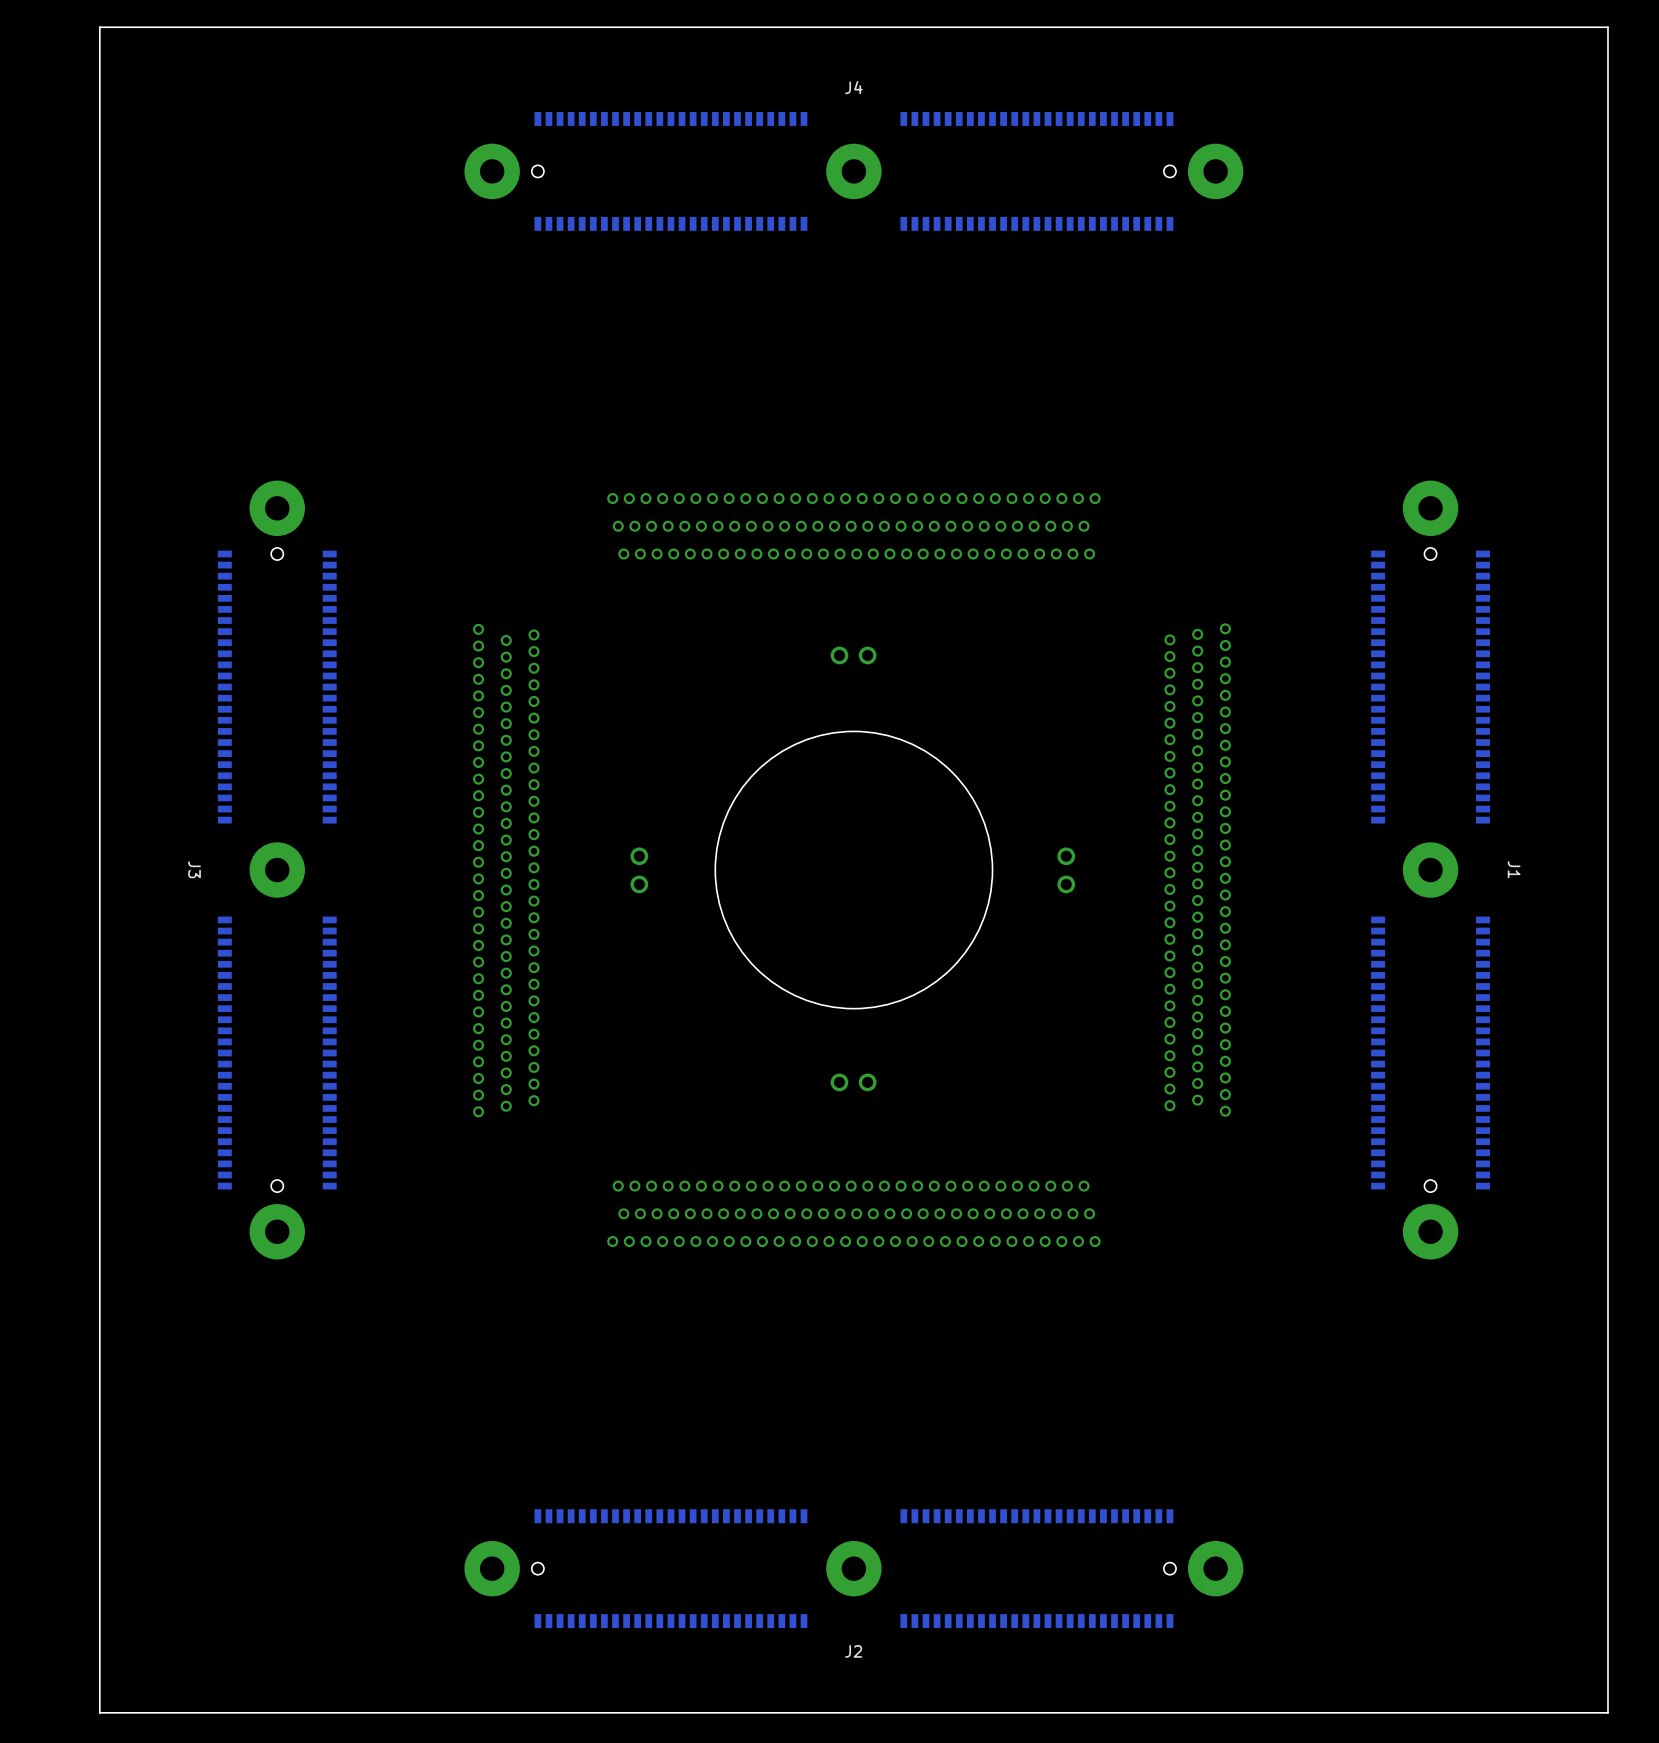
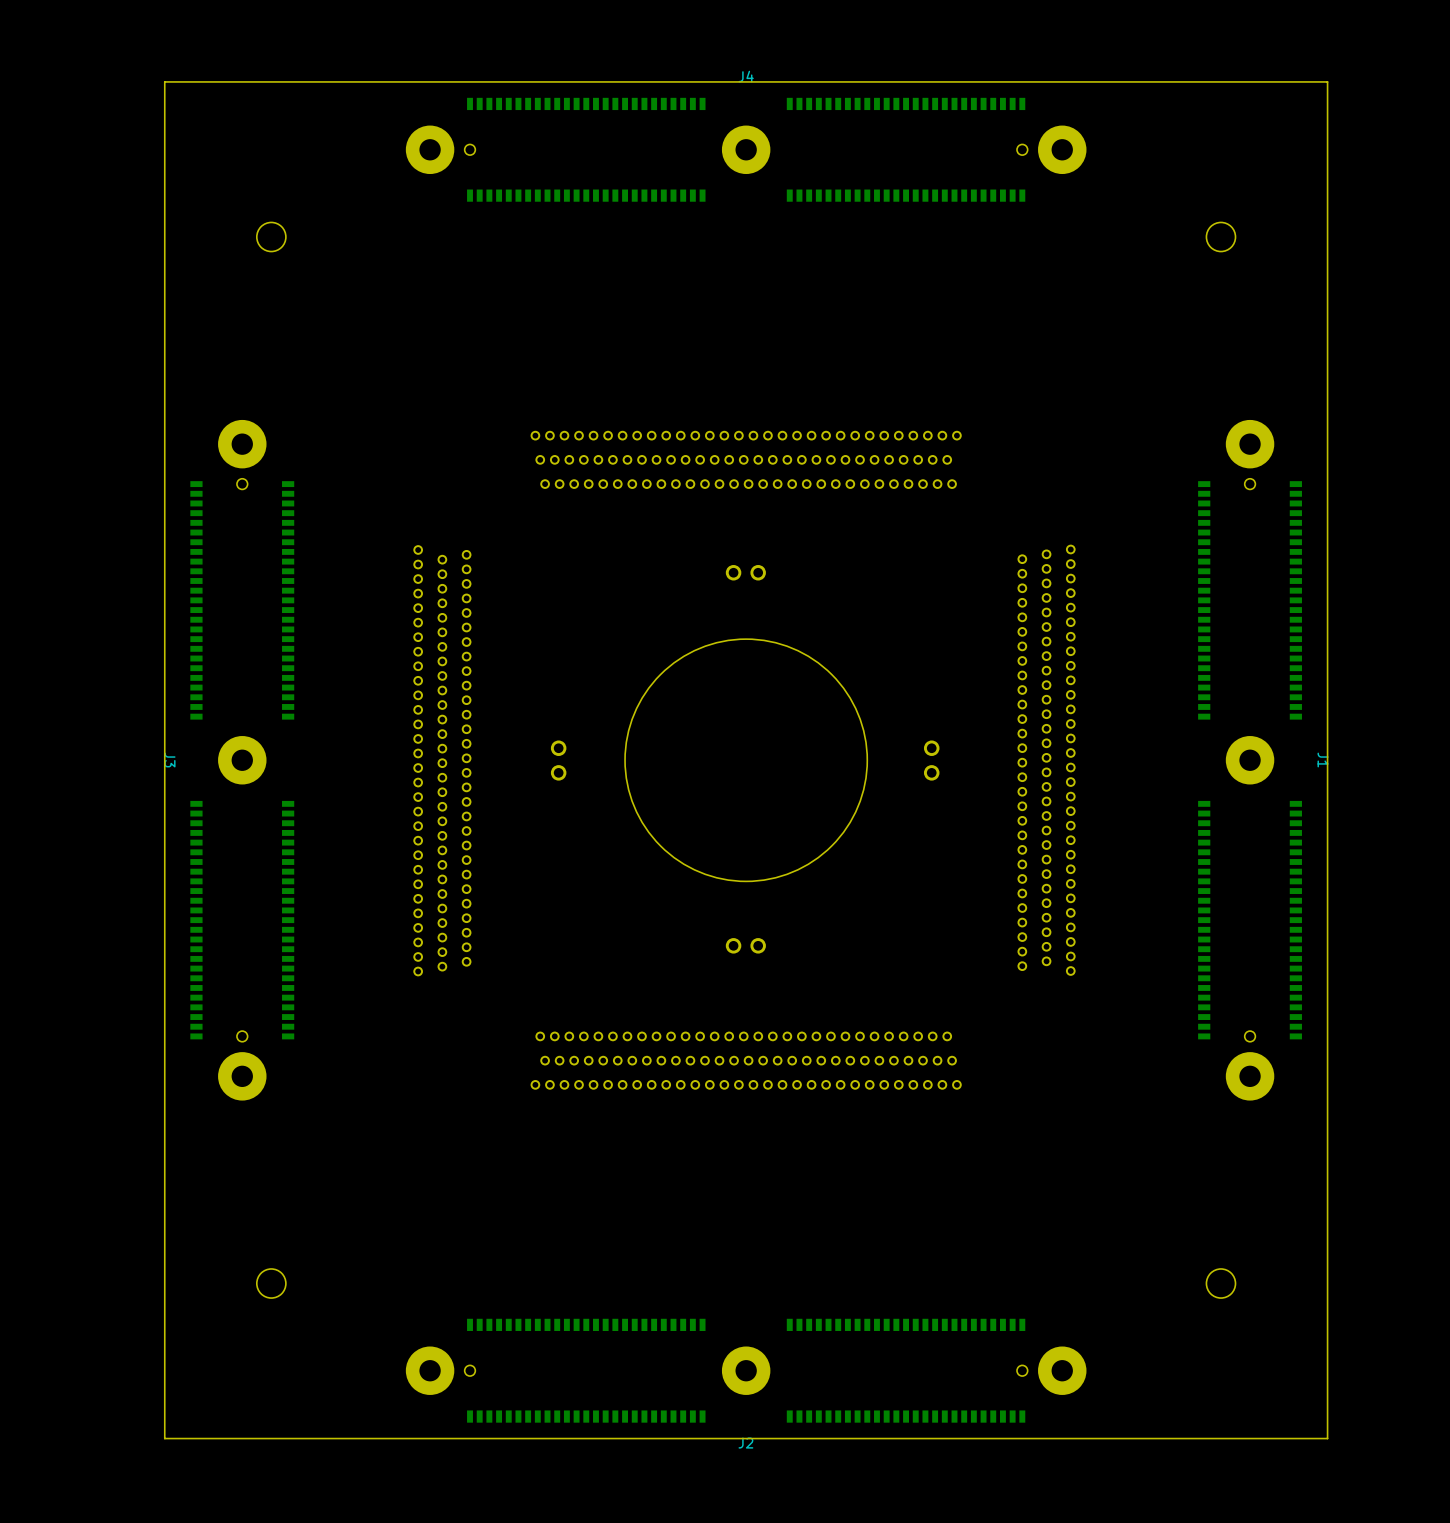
board edge: (1607, 27) (99, 27) (99, 1712) (1607, 1712) (1607, 27) -> (1327, 81) (1327, 1438) (164, 1438) (164, 81) (1327, 81)
round board edge: none -> [256, 222, 287, 252]
round board edge: none -> [1206, 222, 1236, 252]
round board edge: none -> [256, 1268, 287, 1299]
round board edge: none -> [1206, 1268, 1236, 1299]

